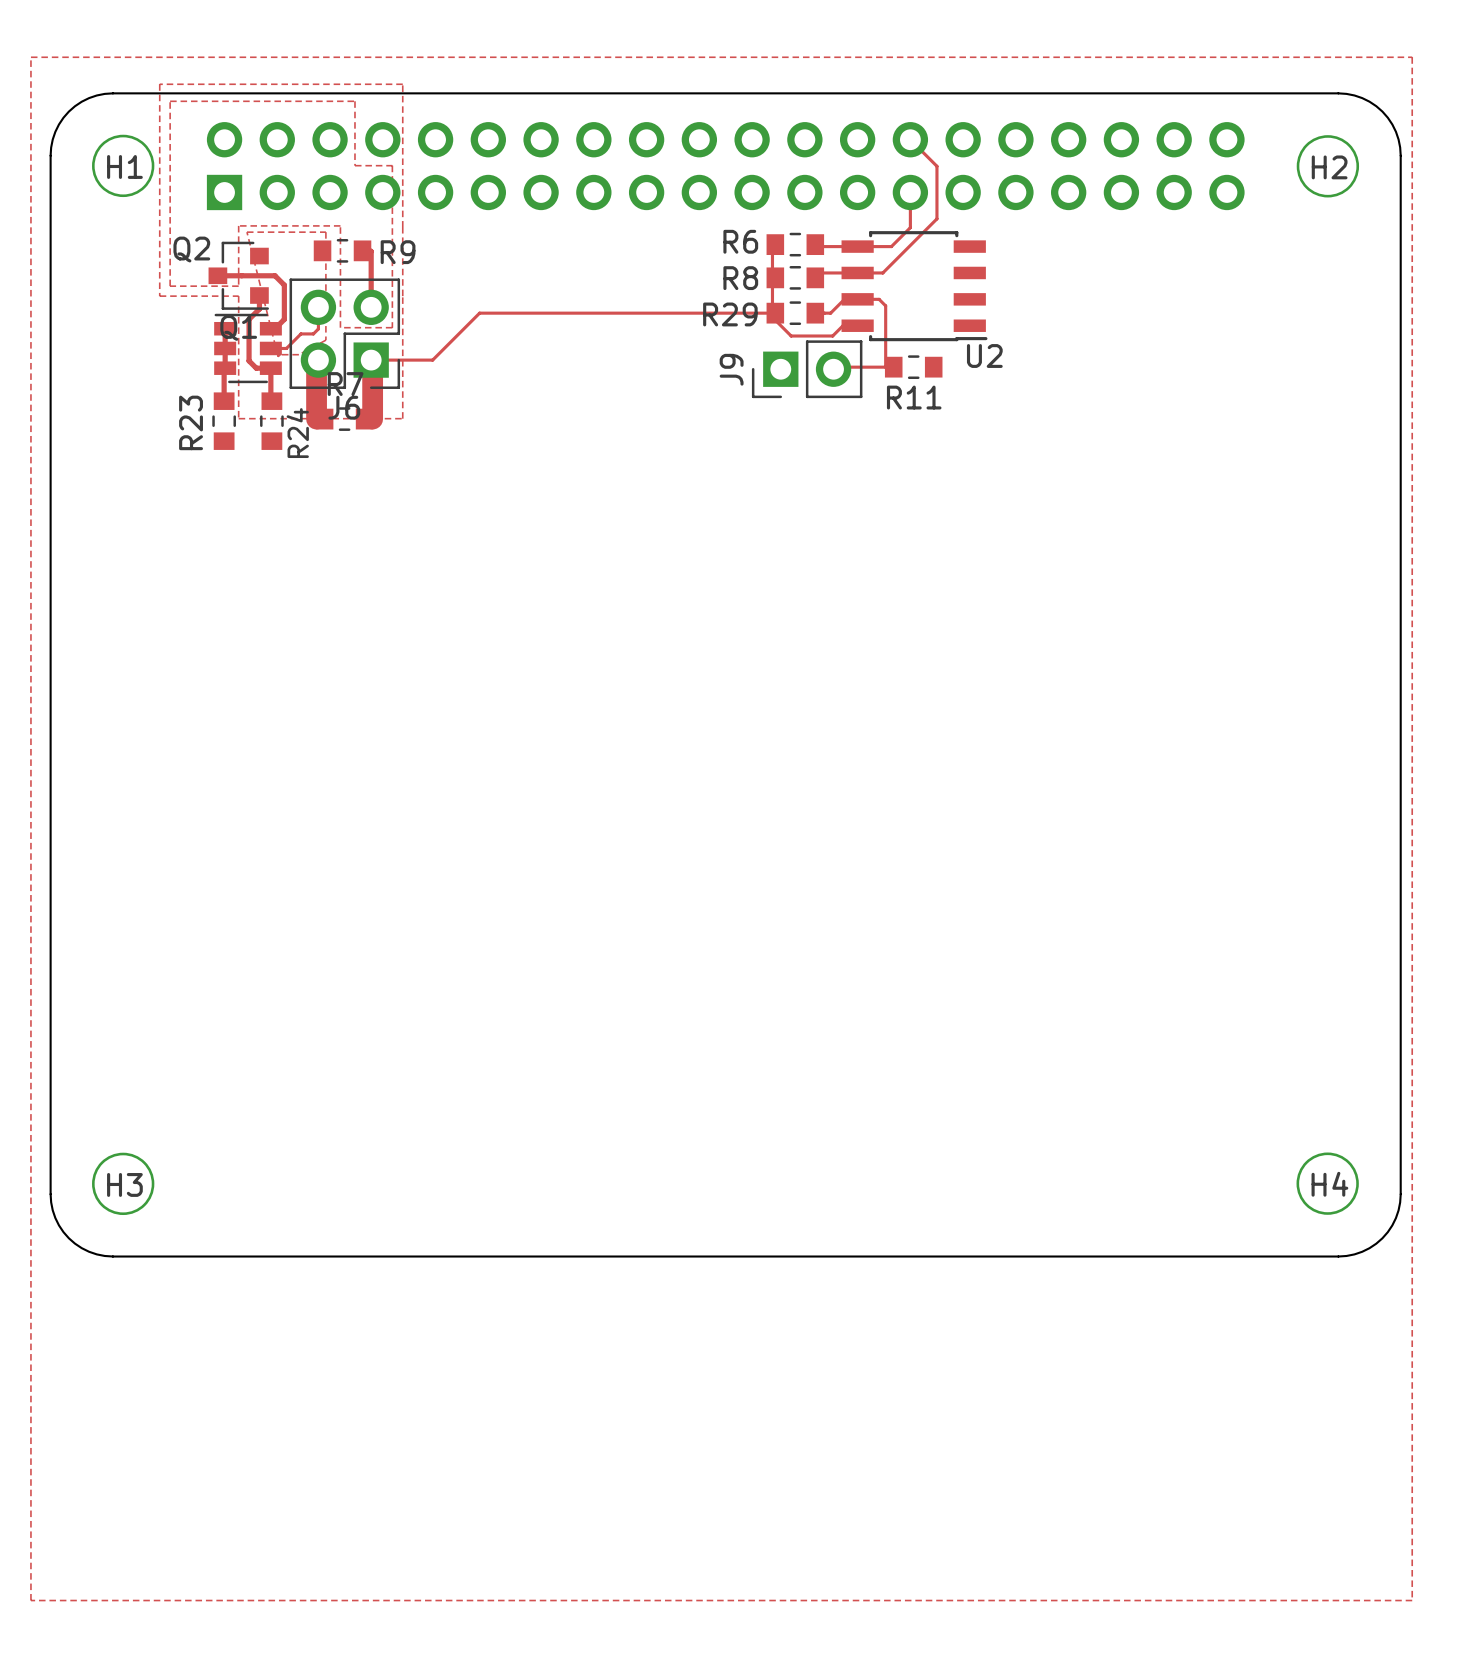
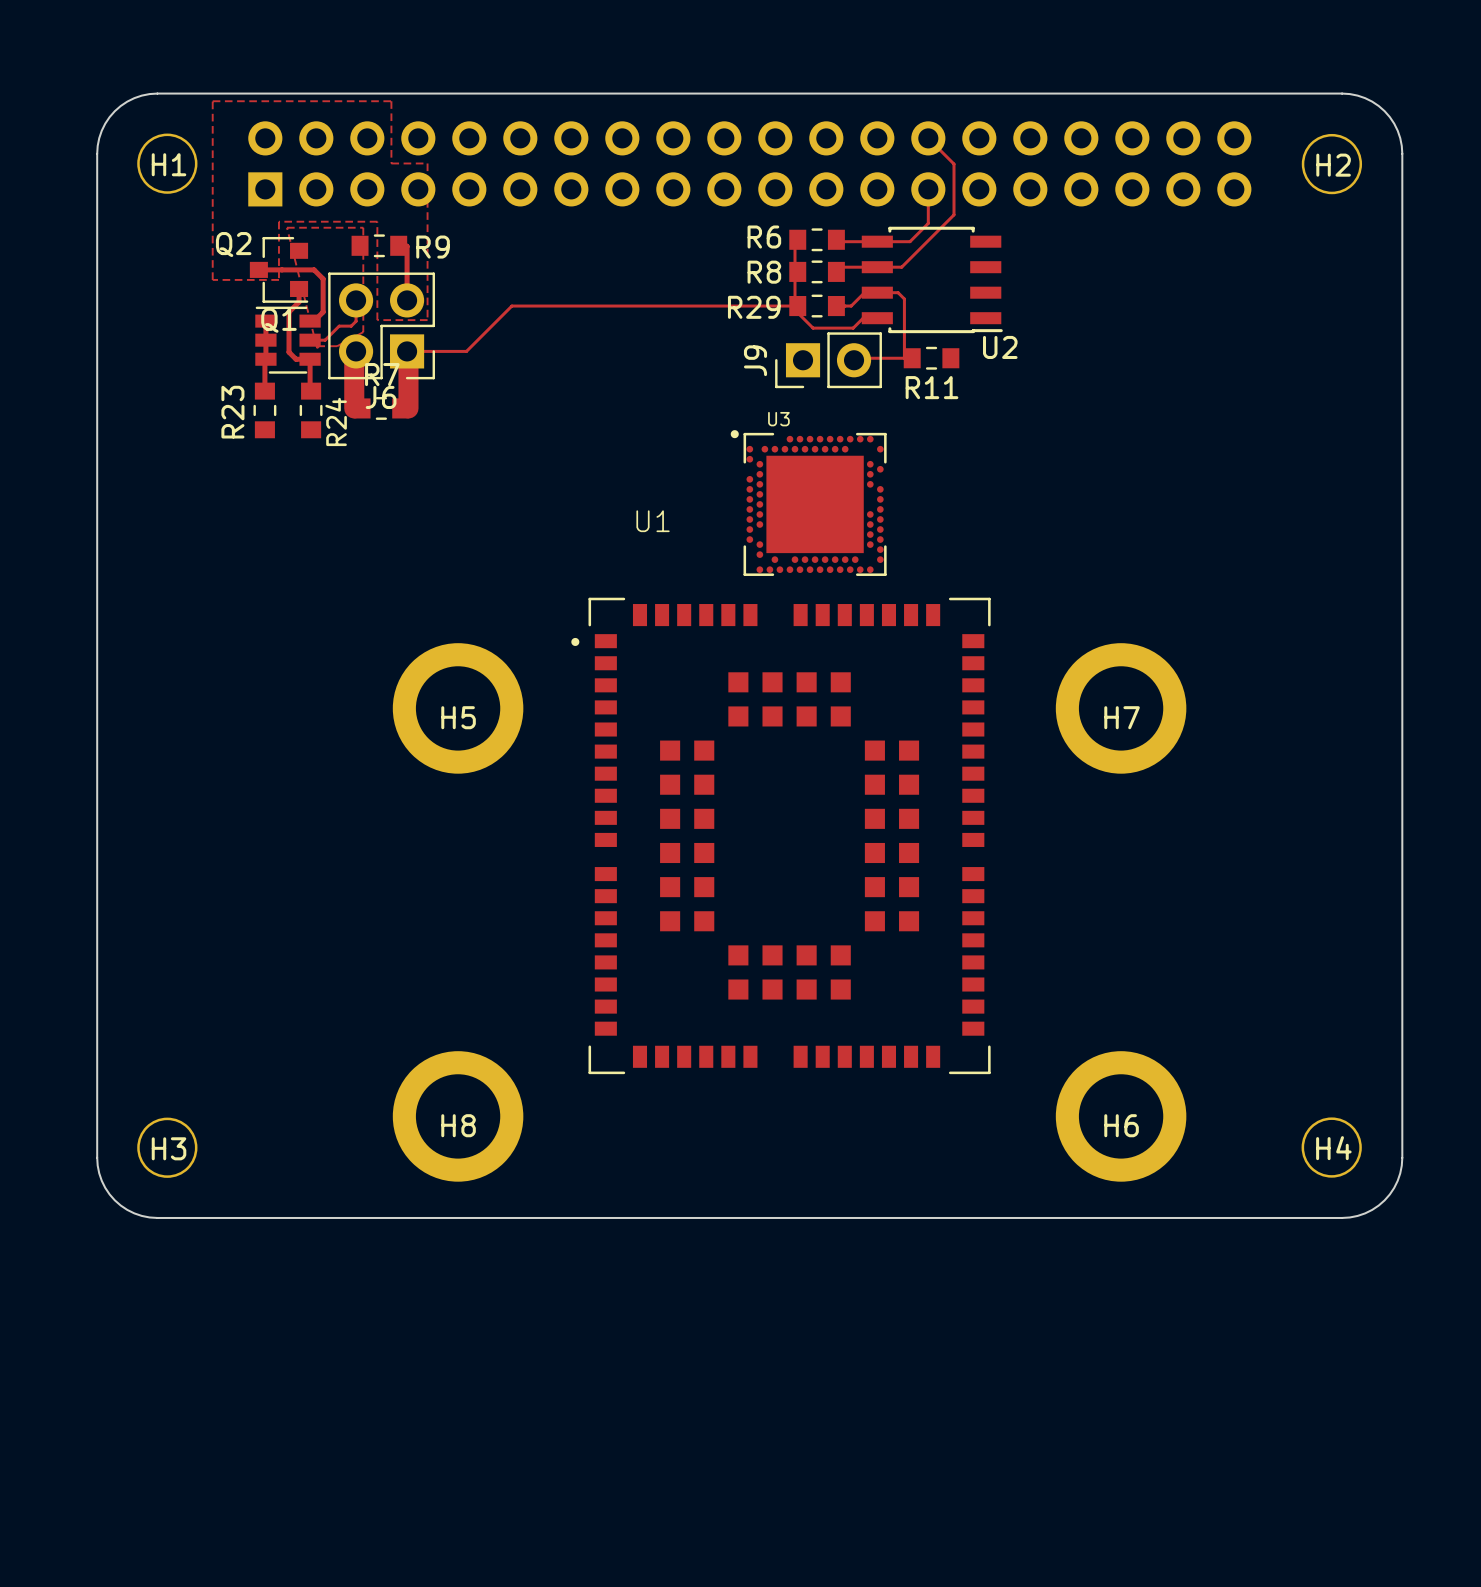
zone outline: (30, 57) (30, 1600) (1412, 1600) (1412, 57) (30, 57) -> none
zone outline: (159, 84) (159, 296) (238, 296) (238, 418) (402, 418) (402, 84) (159, 84) -> none
U3: none -> (808, 503)
H5: none -> (458, 708)
H7: none -> (1121, 708)
U1: none -> (780, 835)
H8: none -> (458, 1116)
H6: none -> (1121, 1116)

